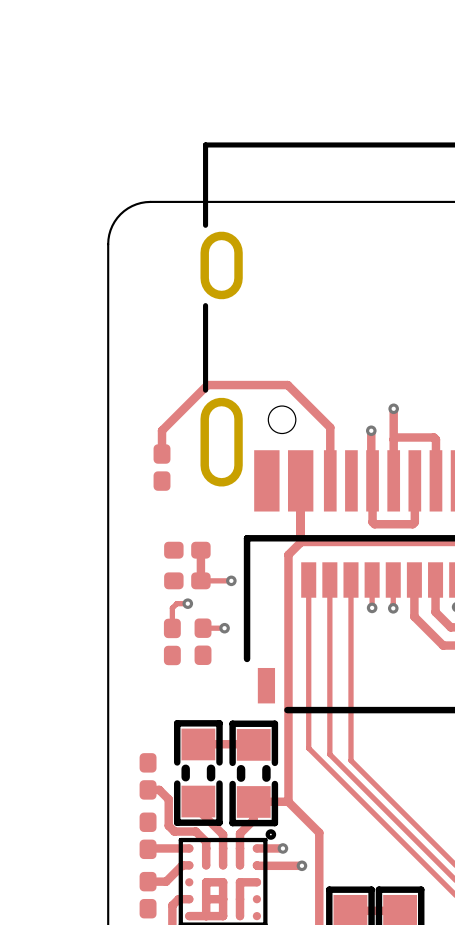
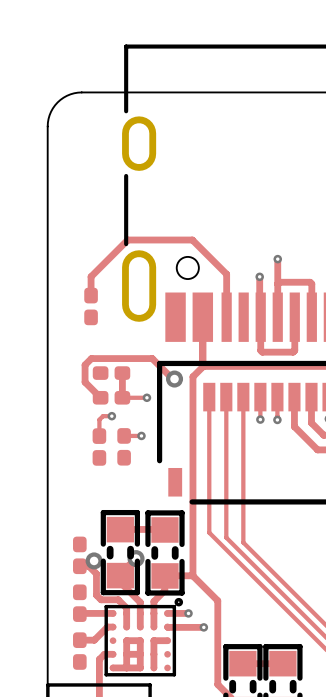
track: none -> (174, 379) (152, 358) (91, 358) (85, 364) (85, 382) (100, 397)
via: none -> (174, 379)
via: none -> (136, 558)
via: none -> (94, 560)

